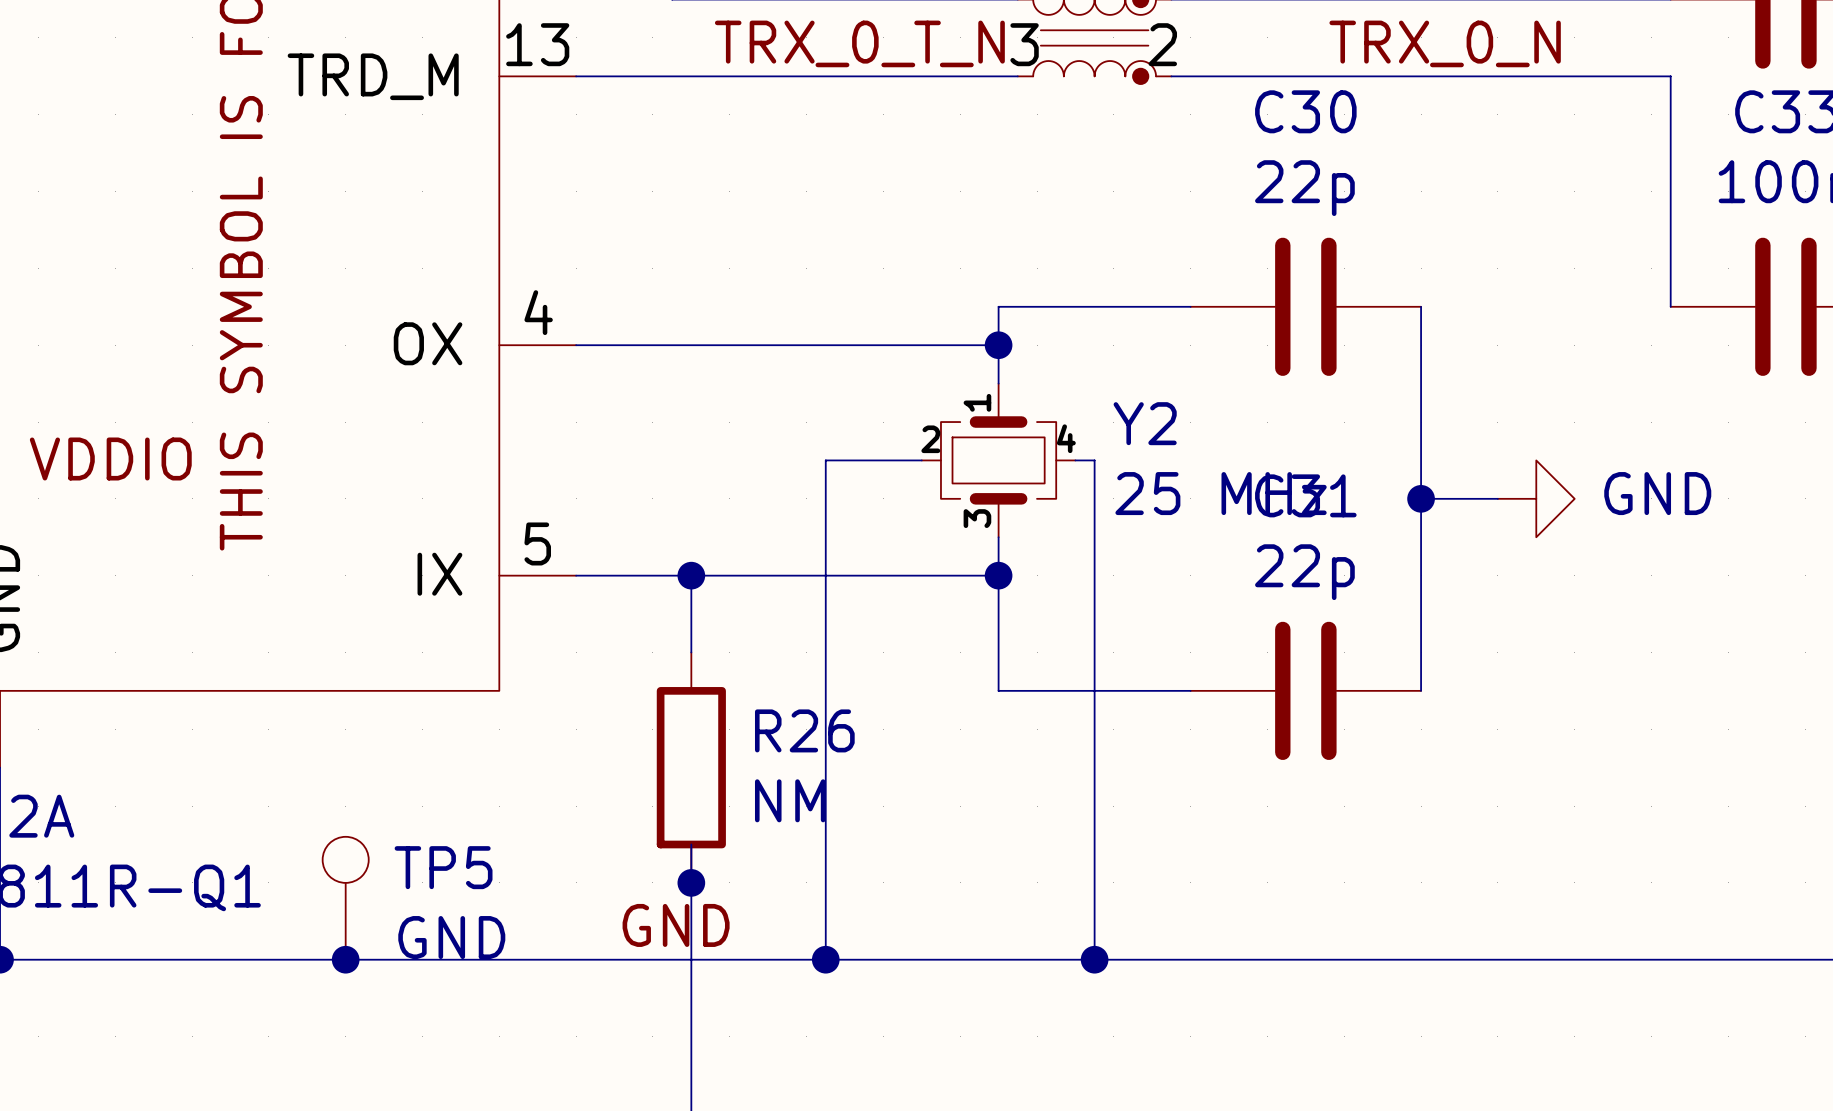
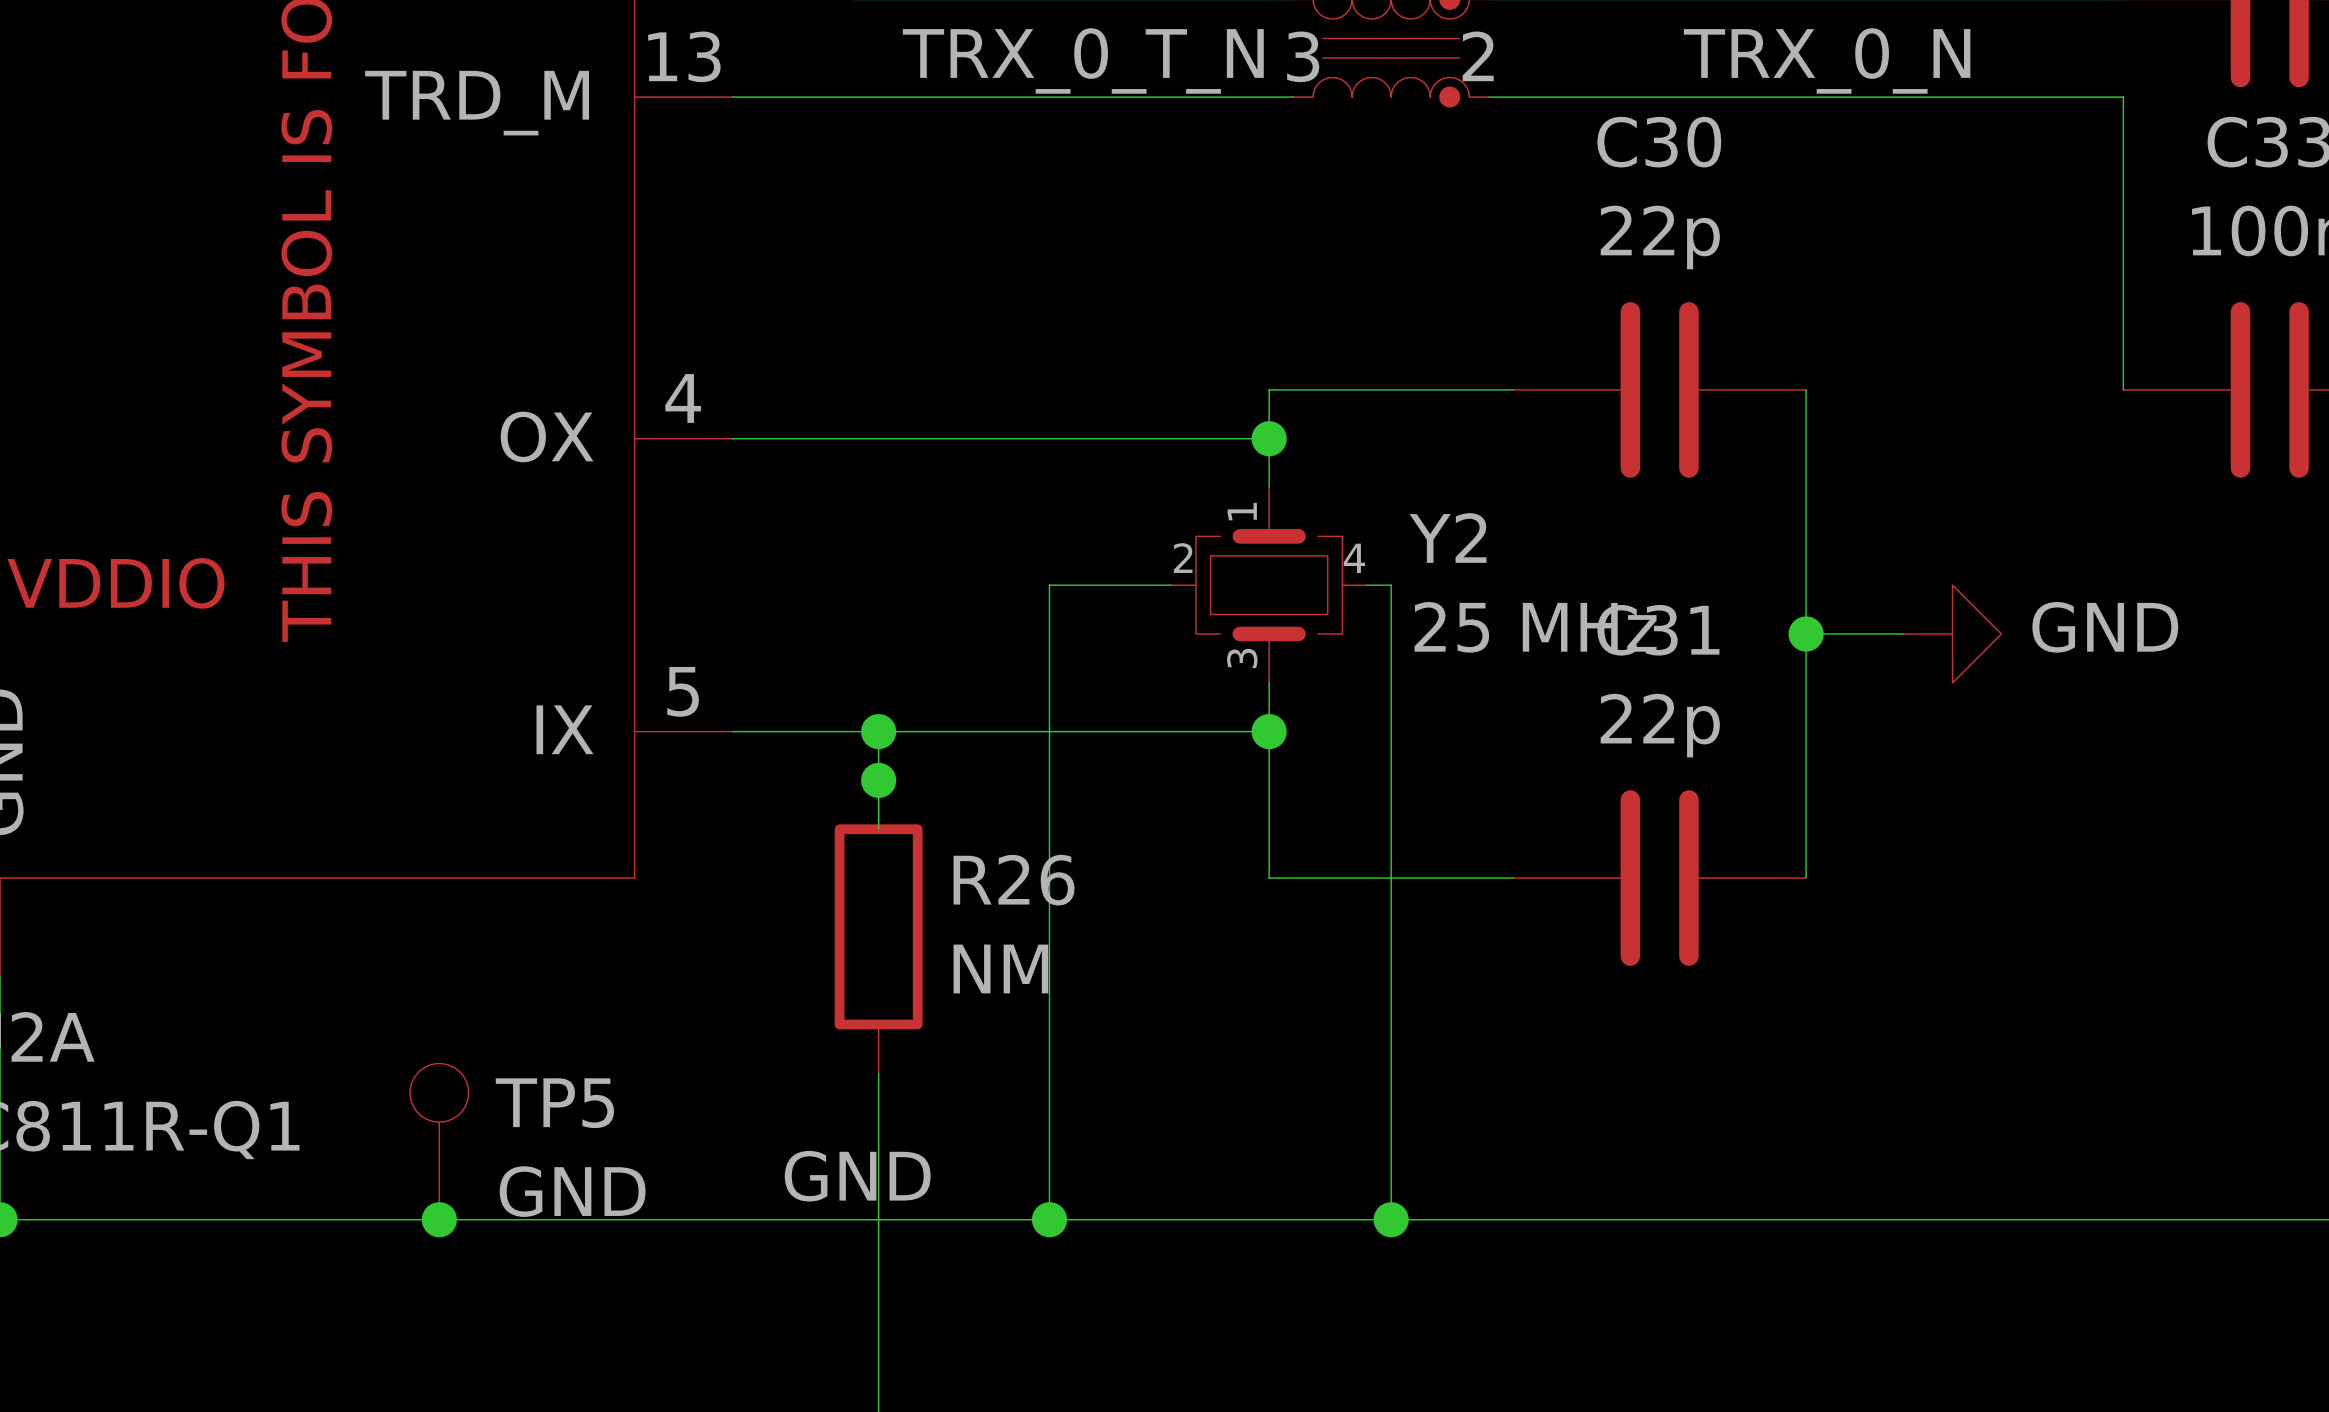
junction: none -> (878, 780)
R26 position: (691, 767) -> (878, 926)
junction: (691, 882) -> none

